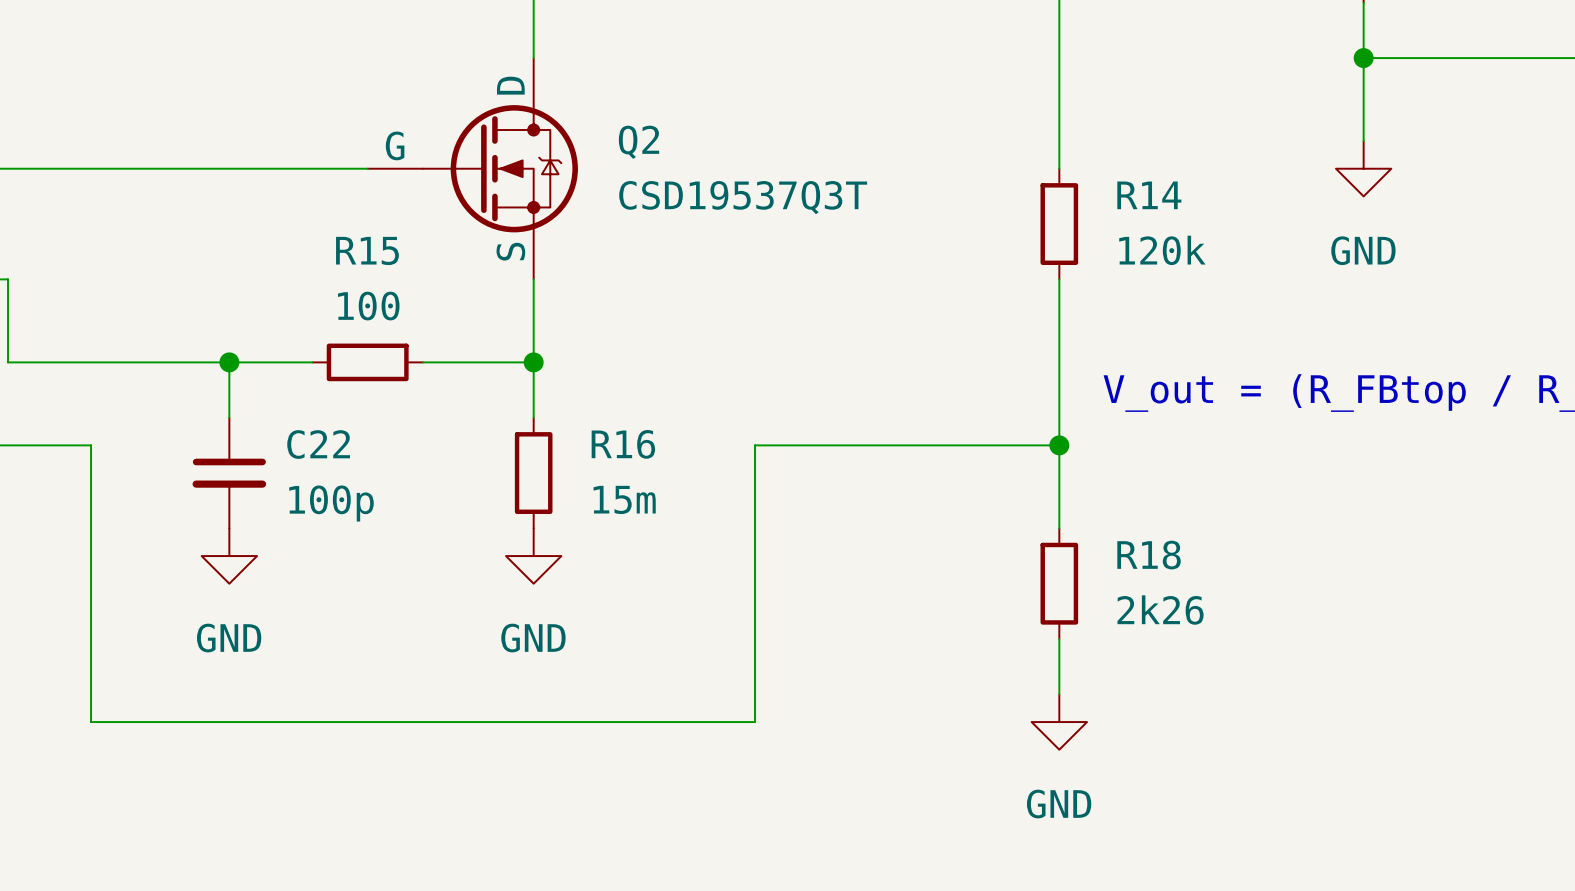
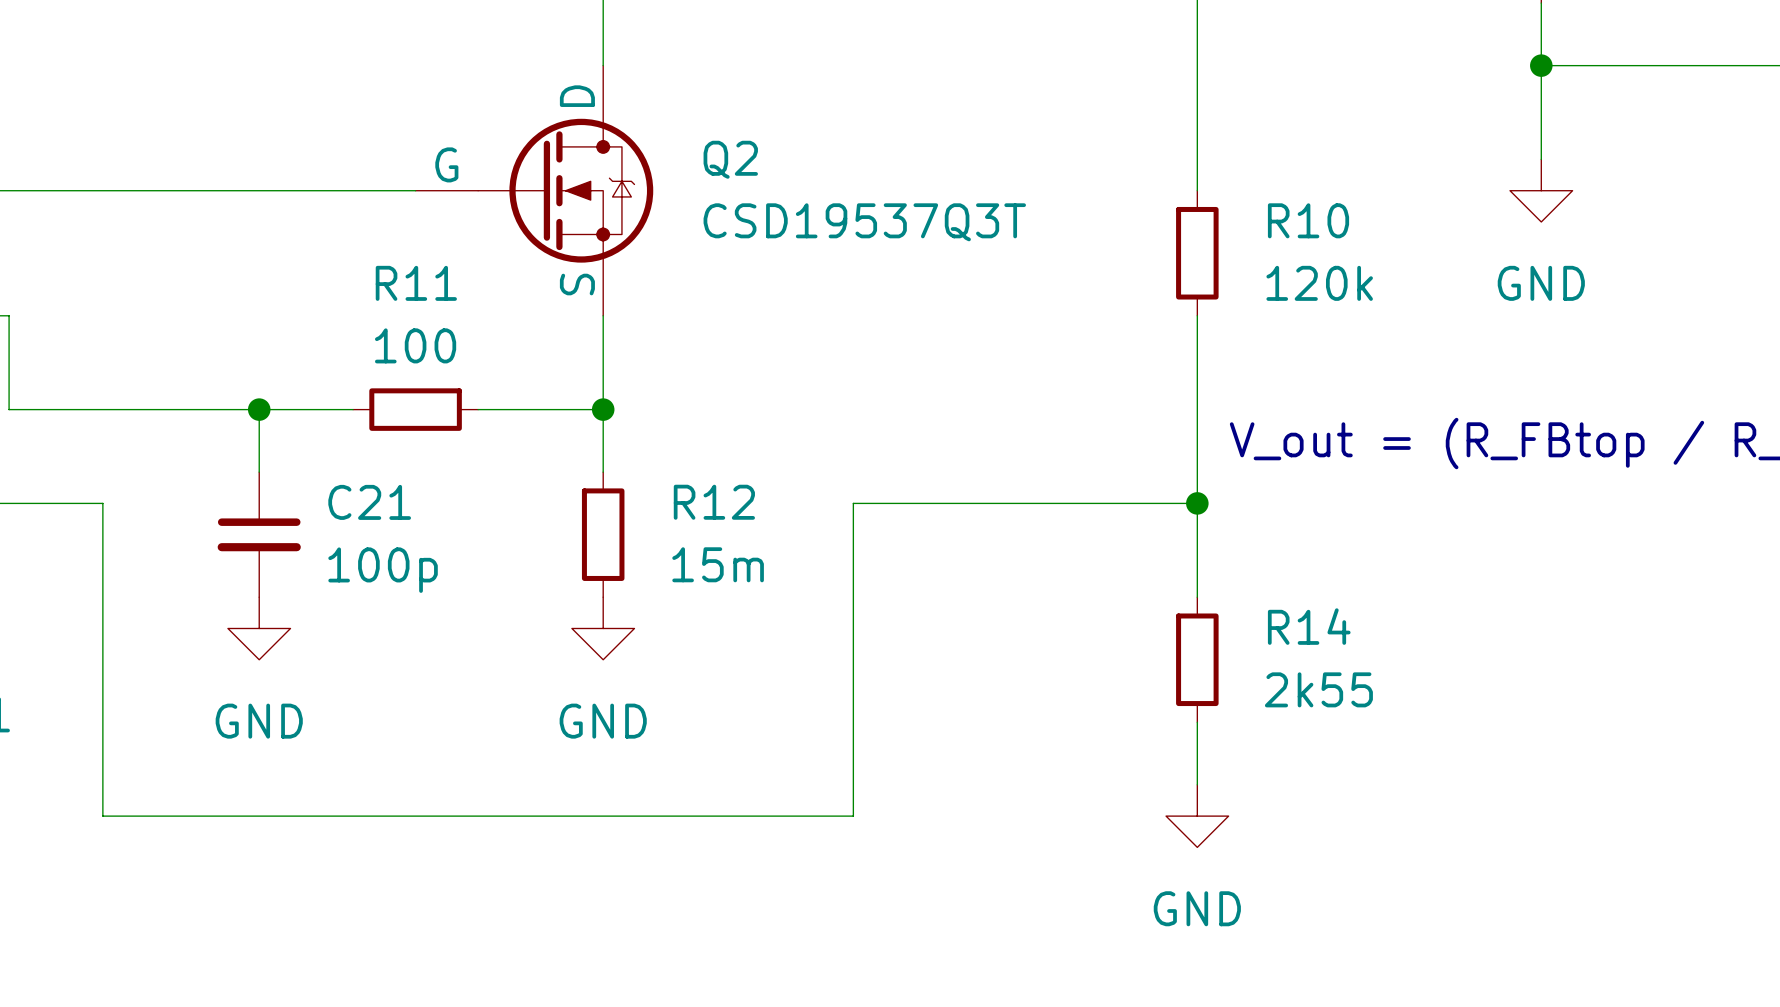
R14 name: R14 (1149, 195) -> R10 (1308, 220)
R15 name: R15 (367, 250) -> R11 (416, 283)
C22 name: C22 (318, 444) -> C21 (369, 502)
R16 name: R16 (623, 444) -> R12 (714, 502)
R18 name: R18 (1149, 555) -> R14 (1309, 626)
R18 value: 2k26 (1160, 610) -> 2k55 (1318, 689)

